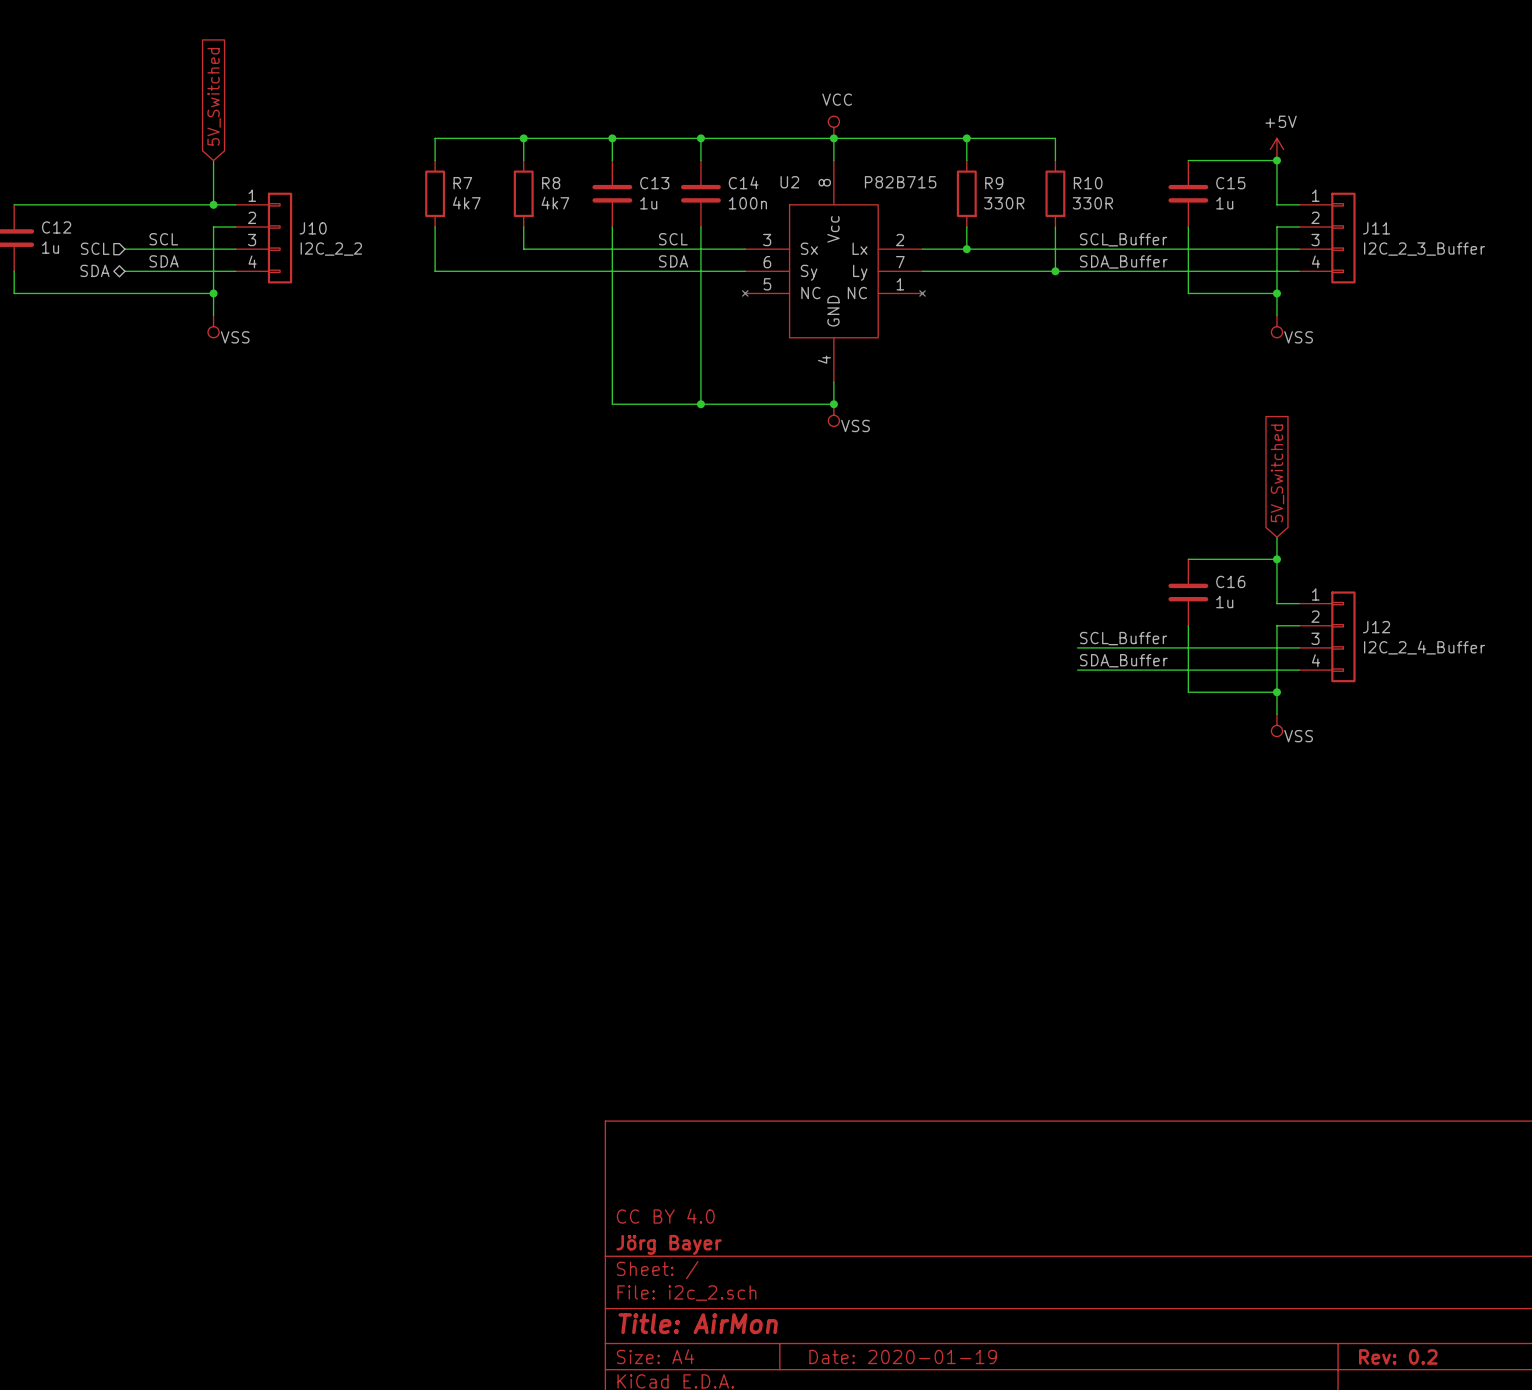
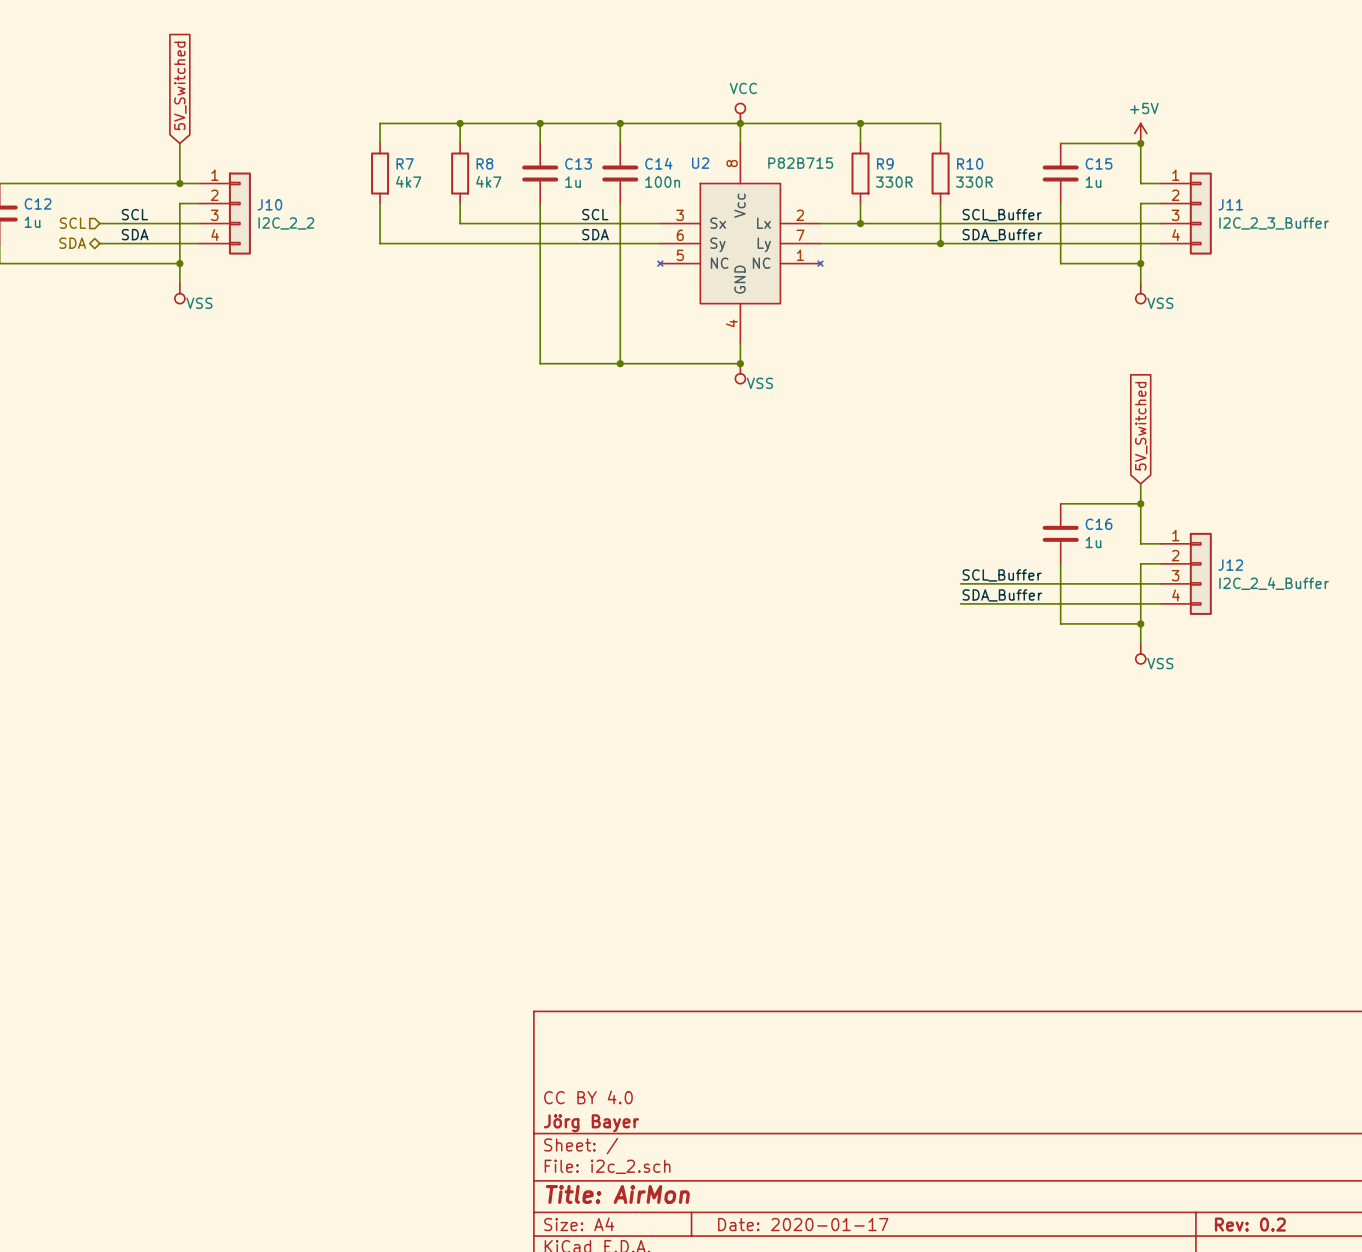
title block: Date: 2020-01-19 (903, 1356) -> Date: 2020-01-17 (803, 1224)

